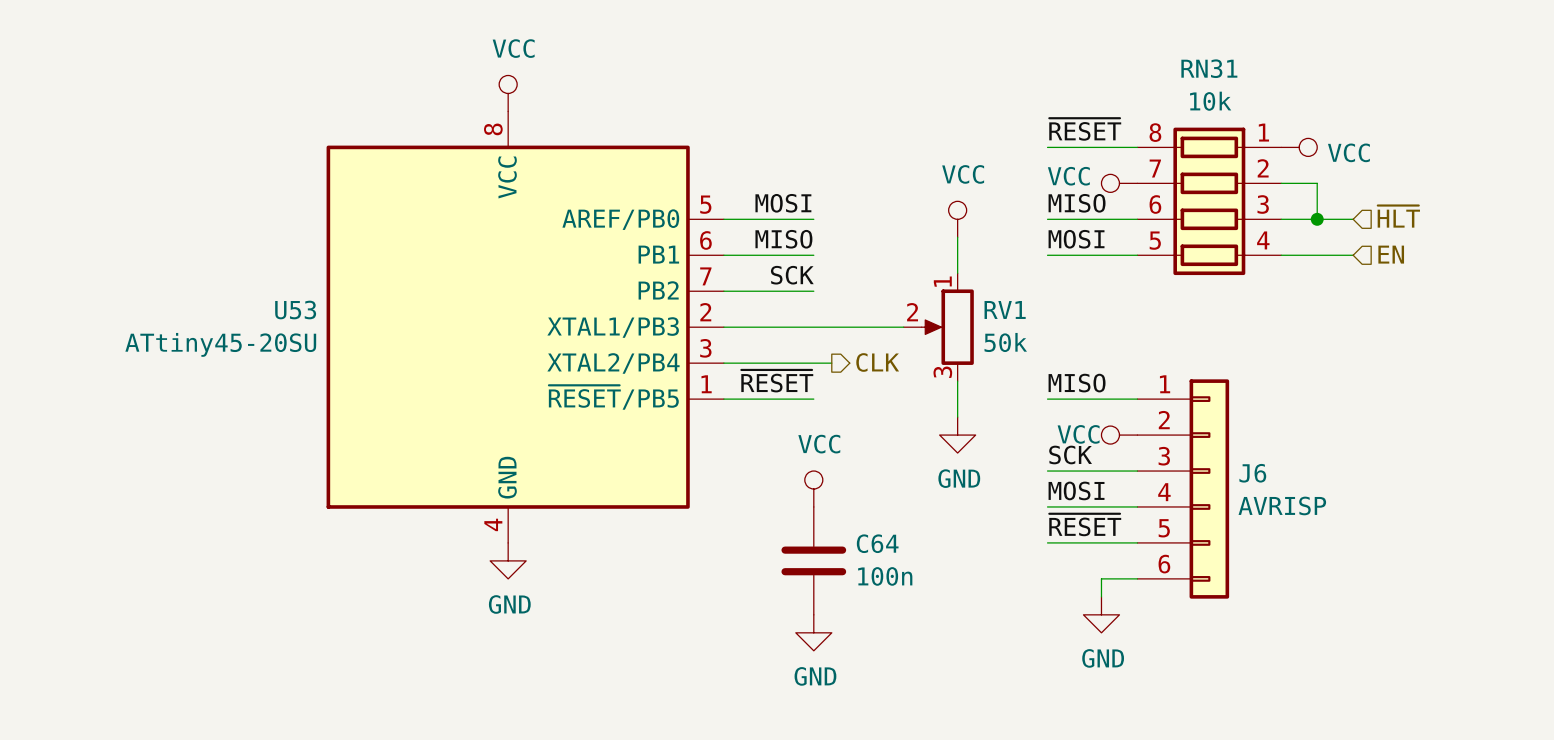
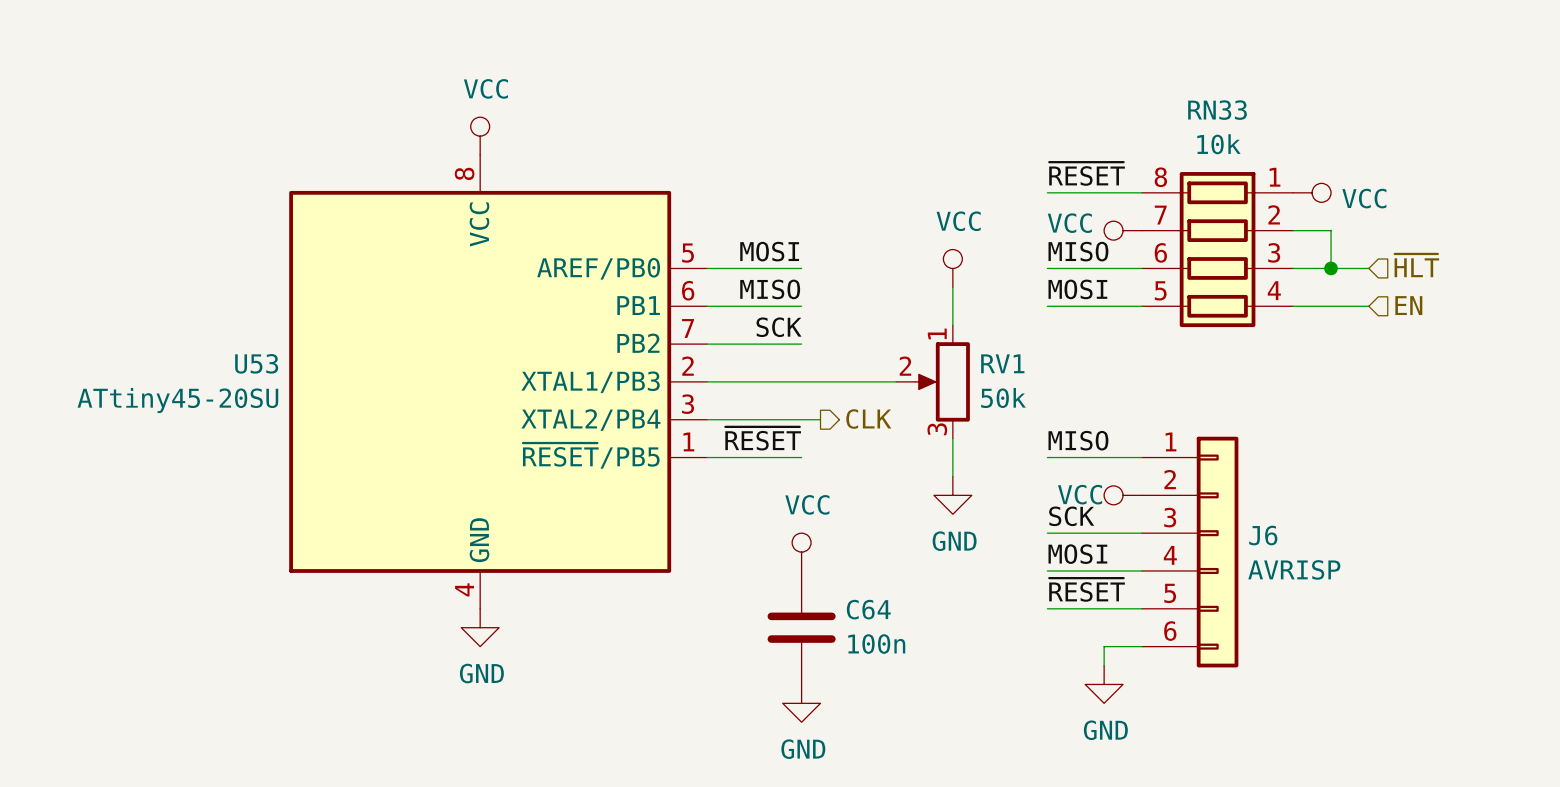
RN31 name: RN31 (1209, 68) -> RN33 (1217, 110)

